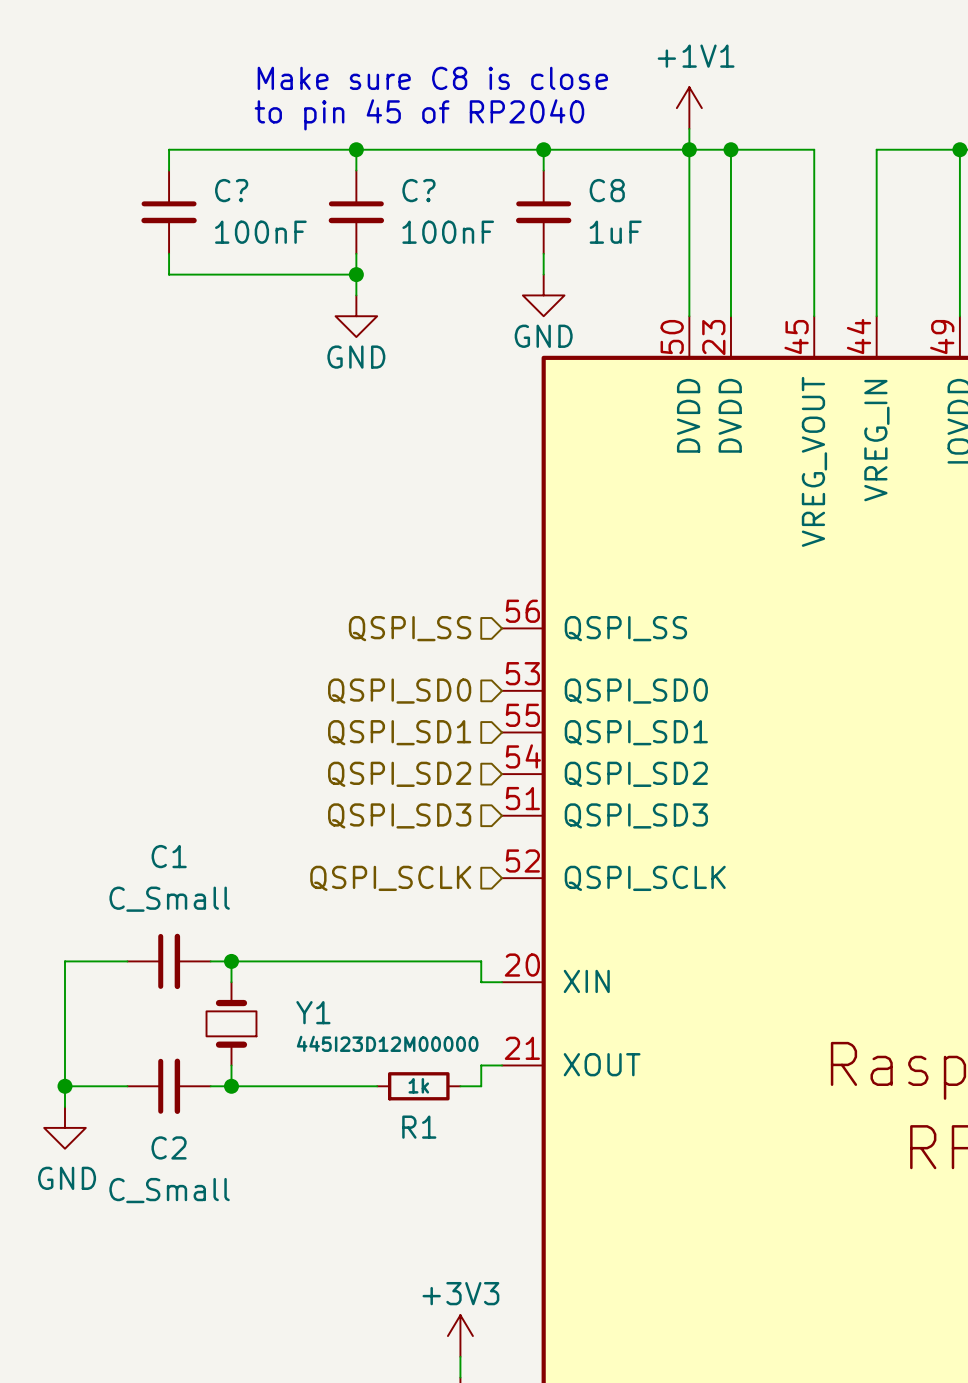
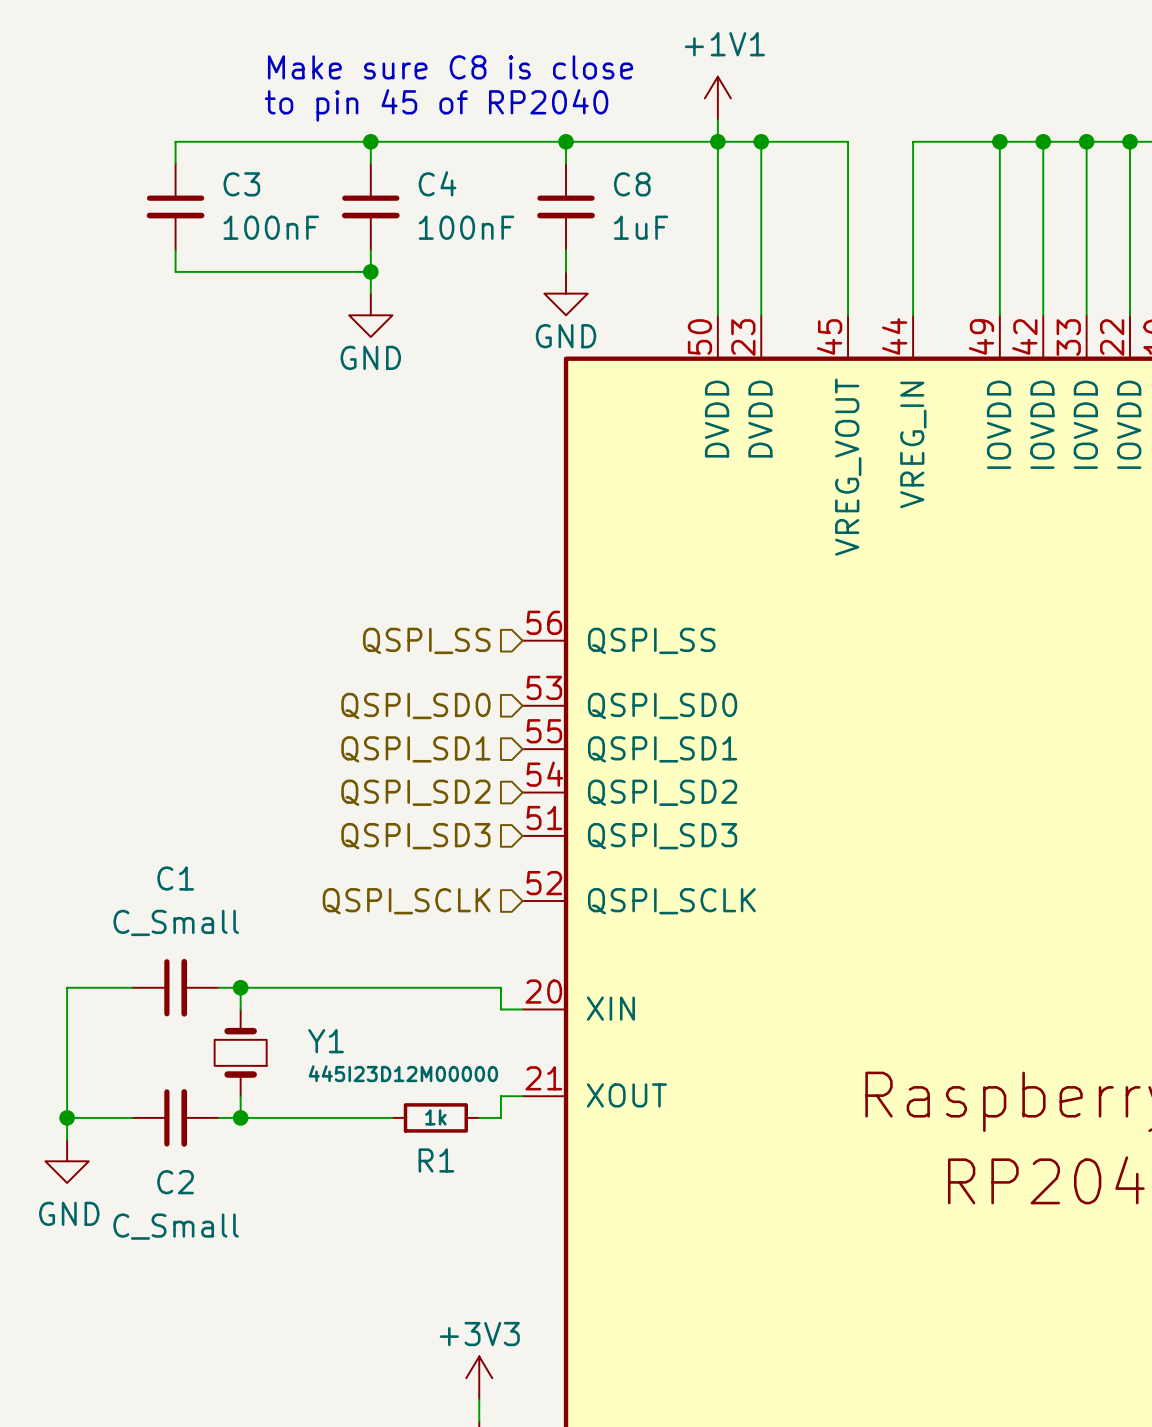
C? name: C? (231, 190) -> C3 (241, 184)
C? name: C? (418, 190) -> C4 (437, 183)

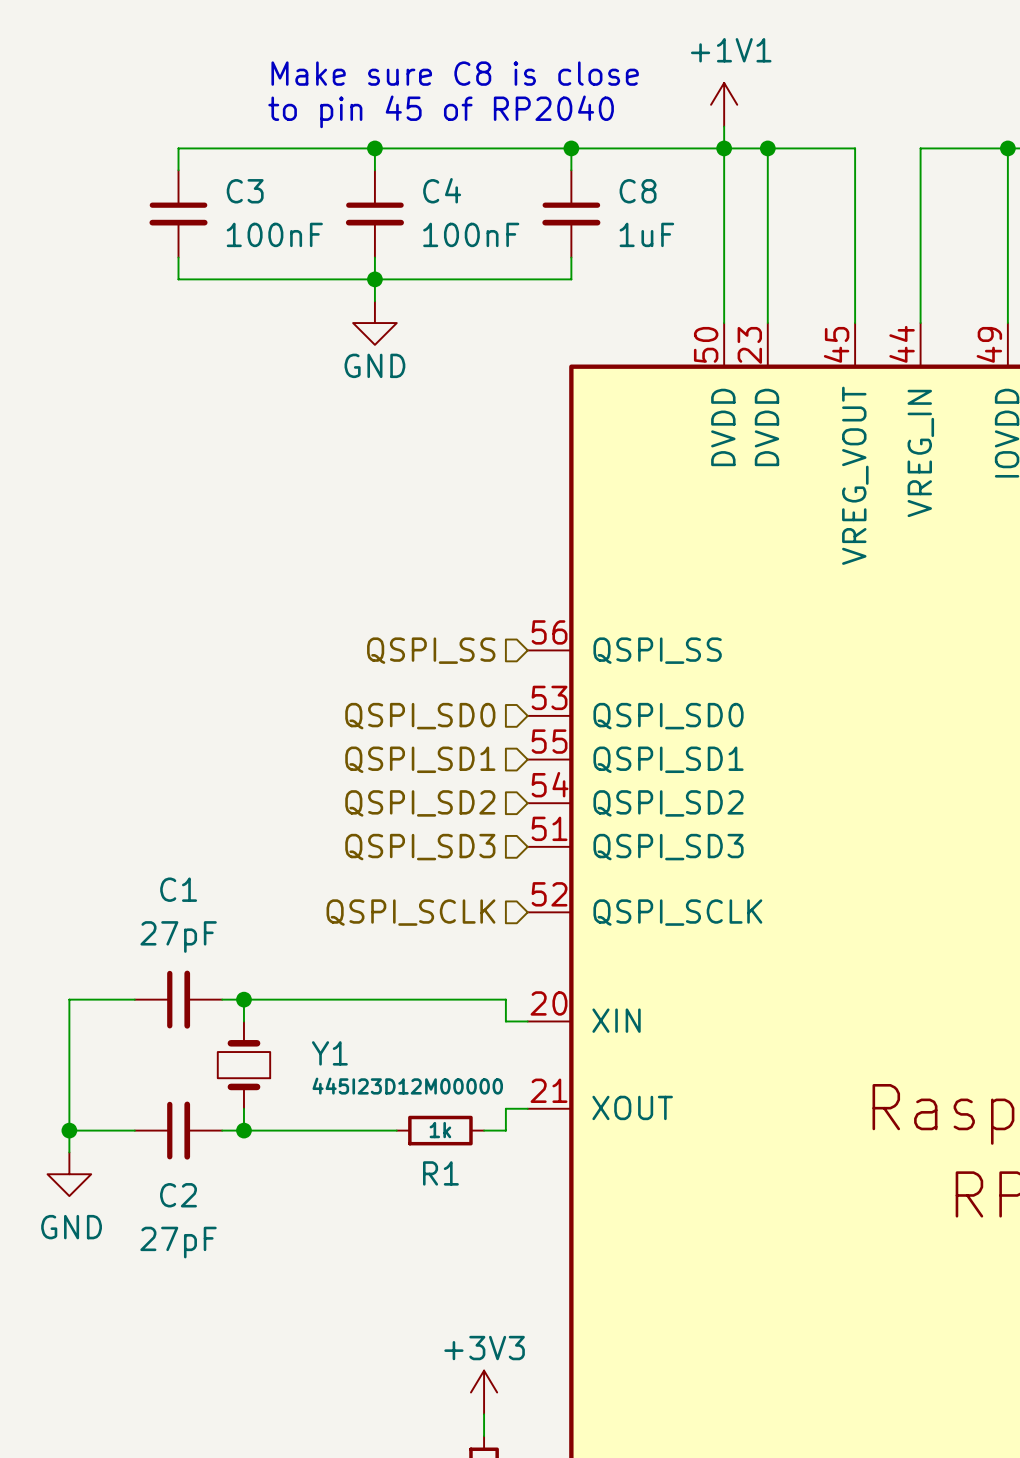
wire: none -> (374, 279) (571, 279)
power symbol: GND (566, 293) -> none
C1 value: C_Small (176, 922) -> 27pF (178, 936)
C2 value: C_Small (176, 1226) -> 27pF (178, 1242)

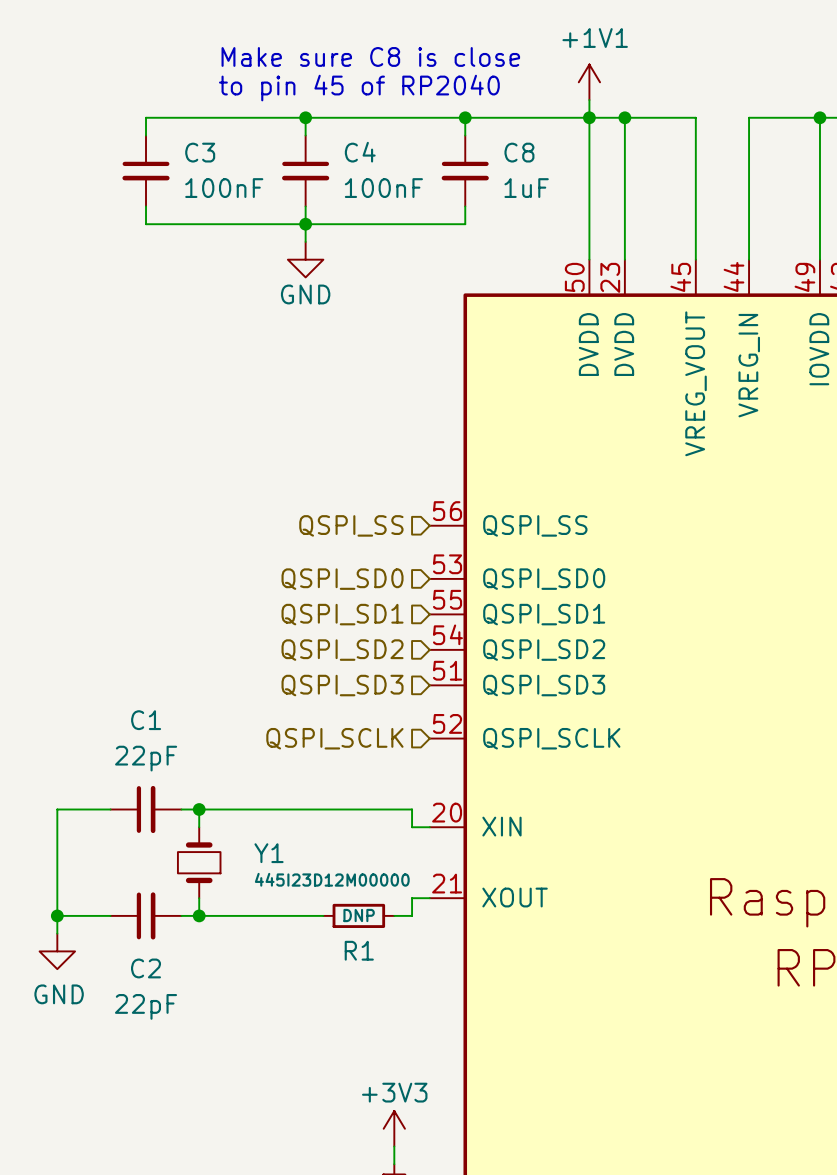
C1 value: 27pF (178, 936) -> 22pF (146, 758)
R1 value: 1k (440, 1130) -> DNP (359, 915)
C2 value: 27pF (178, 1242) -> 22pF (146, 1006)

